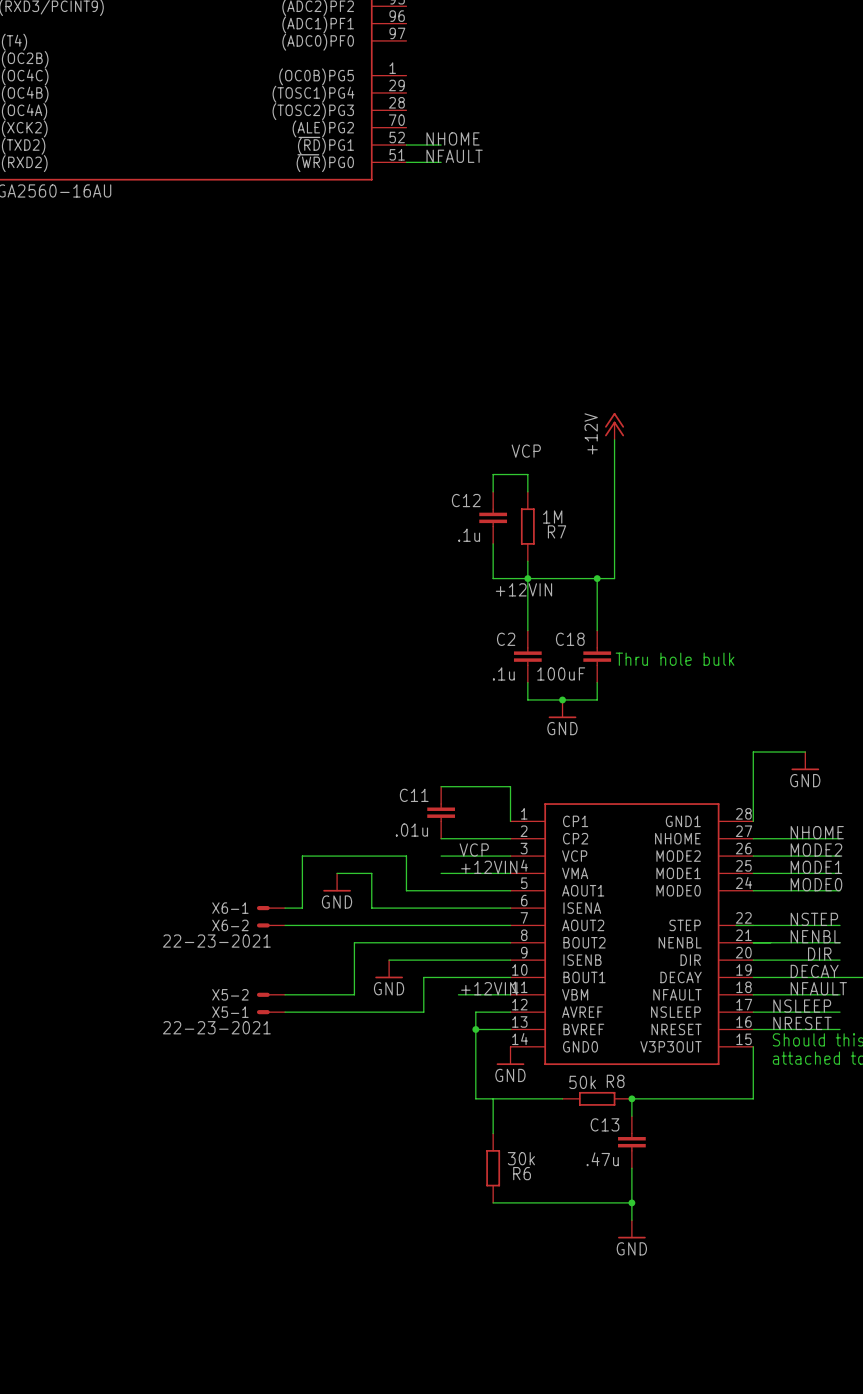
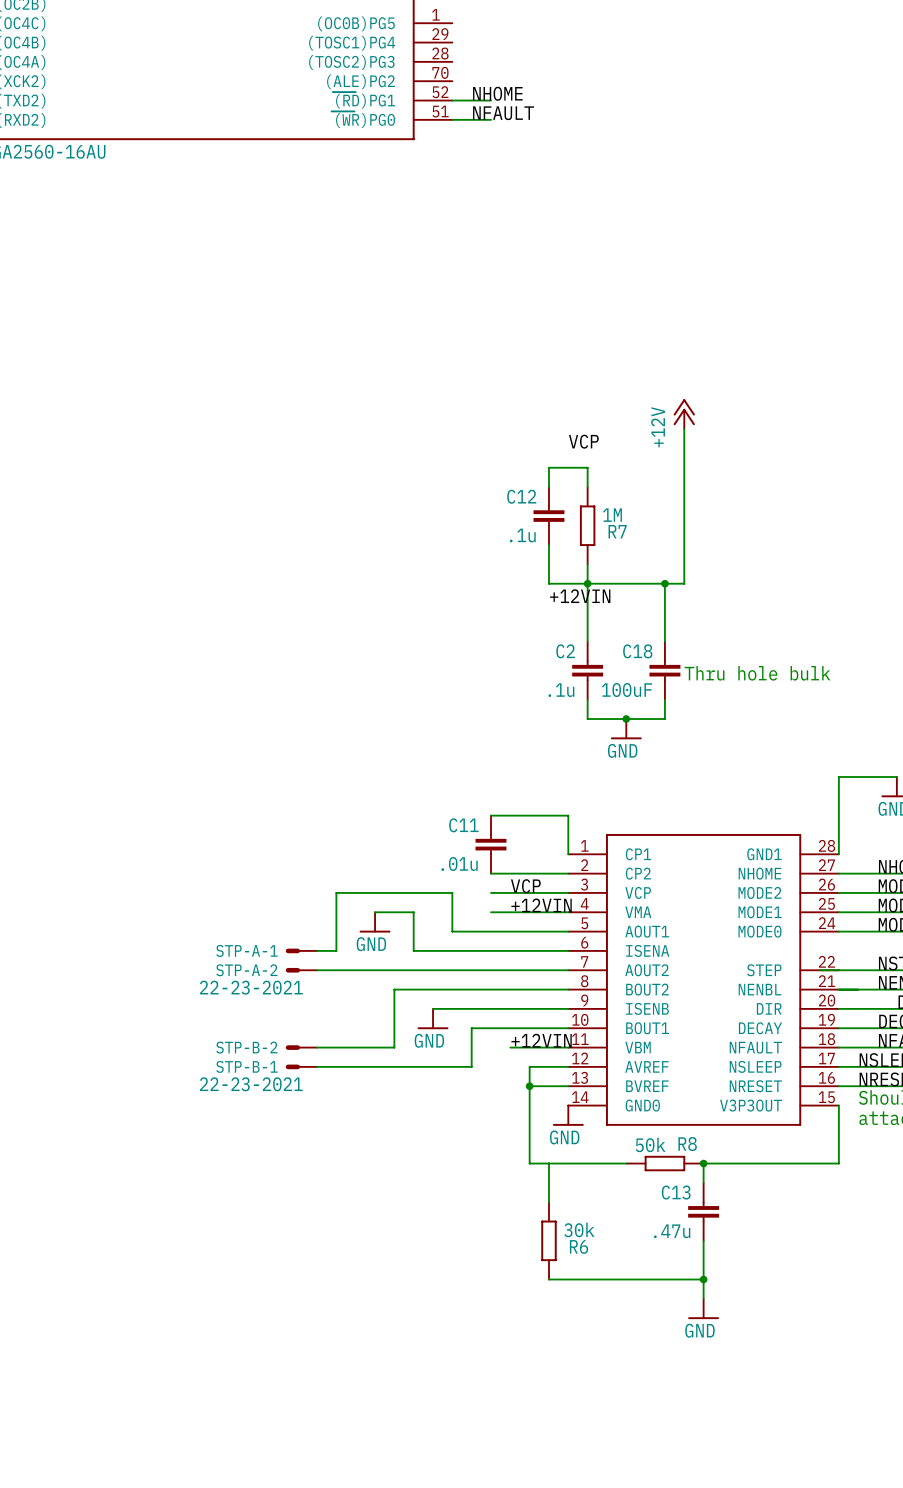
X6-1 name: X6-1 (230, 908) -> STP-A-1 (246, 950)
X6-2 name: X6-2 (230, 925) -> STP-A-2 (246, 970)
X5-2 name: X5-2 (230, 994) -> STP-B-2 (246, 1047)
X5-1 name: X5-1 (230, 1012) -> STP-B-1 (246, 1066)

